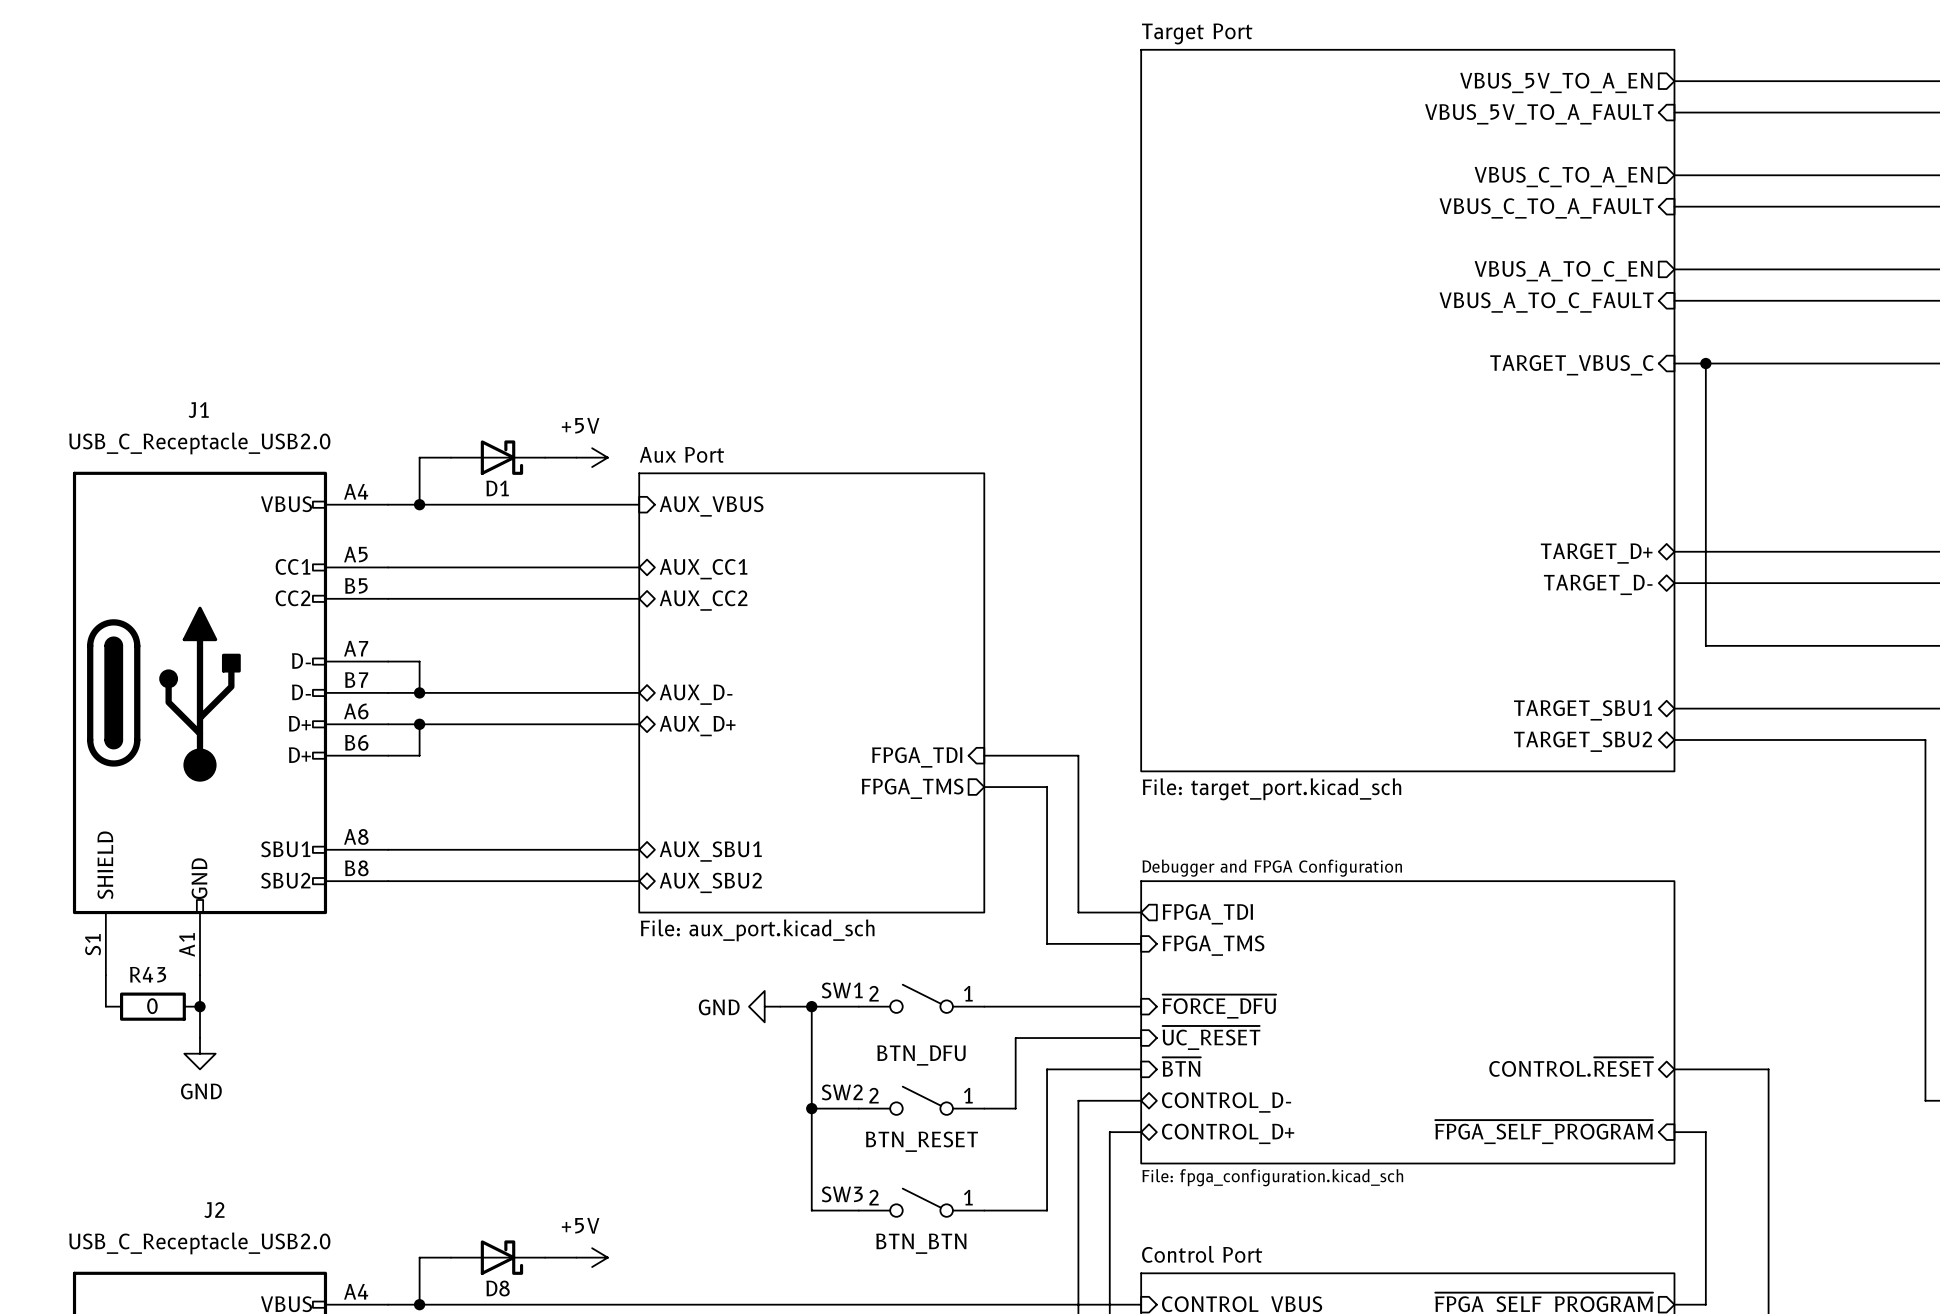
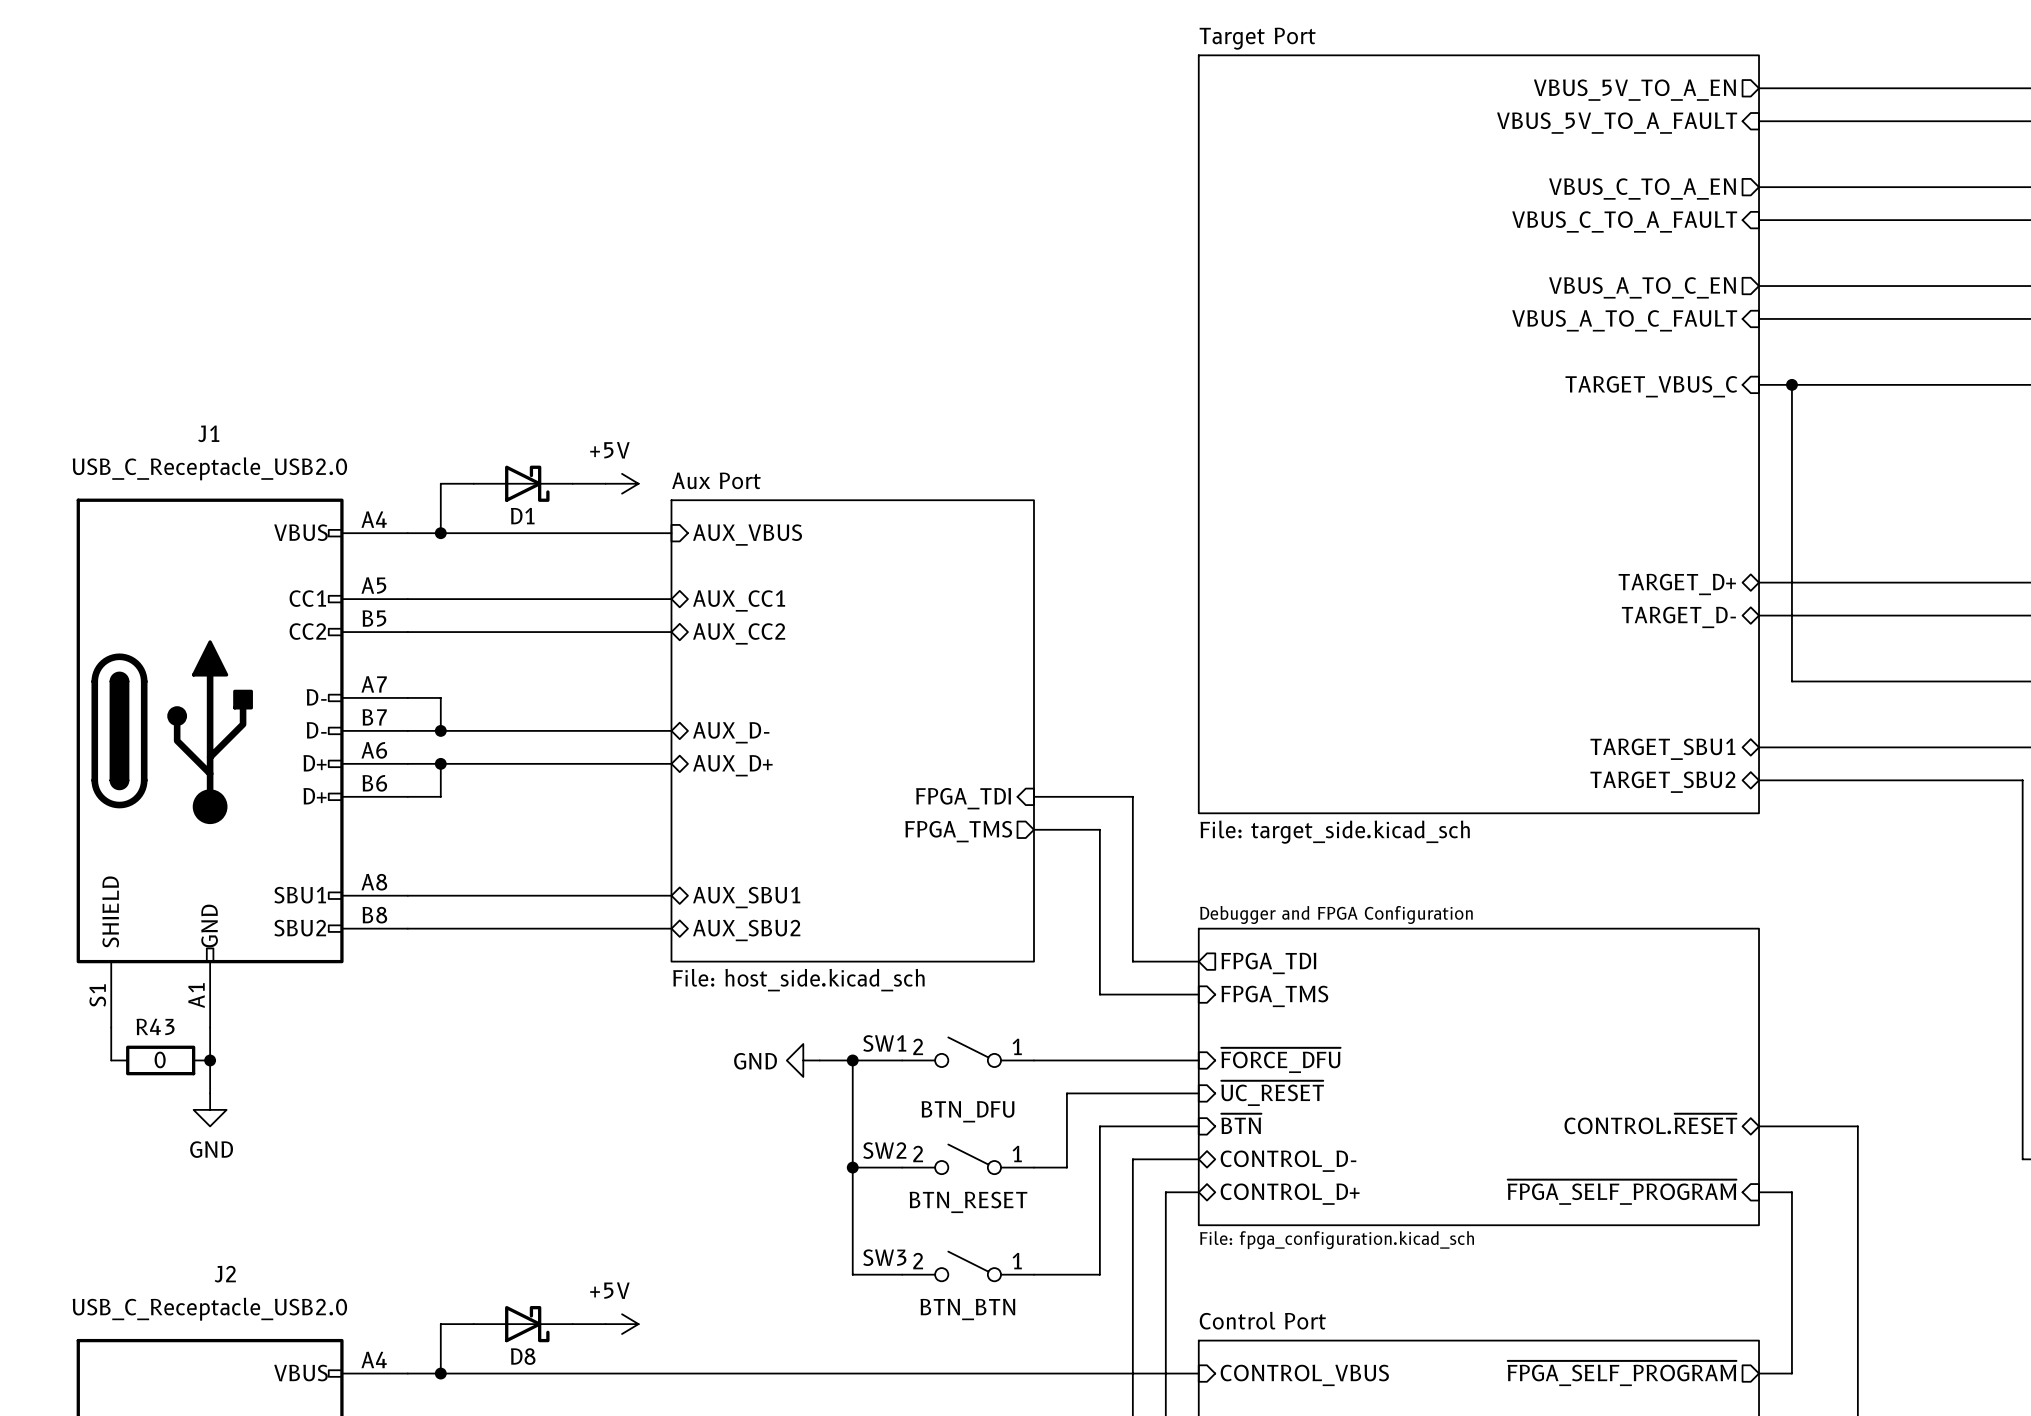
sheet Target Port value: File: target_port.kicad_sch (1272, 789) -> File: target_side.kicad_sch (1335, 832)
sheet Aux Port value: File: aux_port.kicad_sch (757, 930) -> File: host_side.kicad_sch (798, 980)

